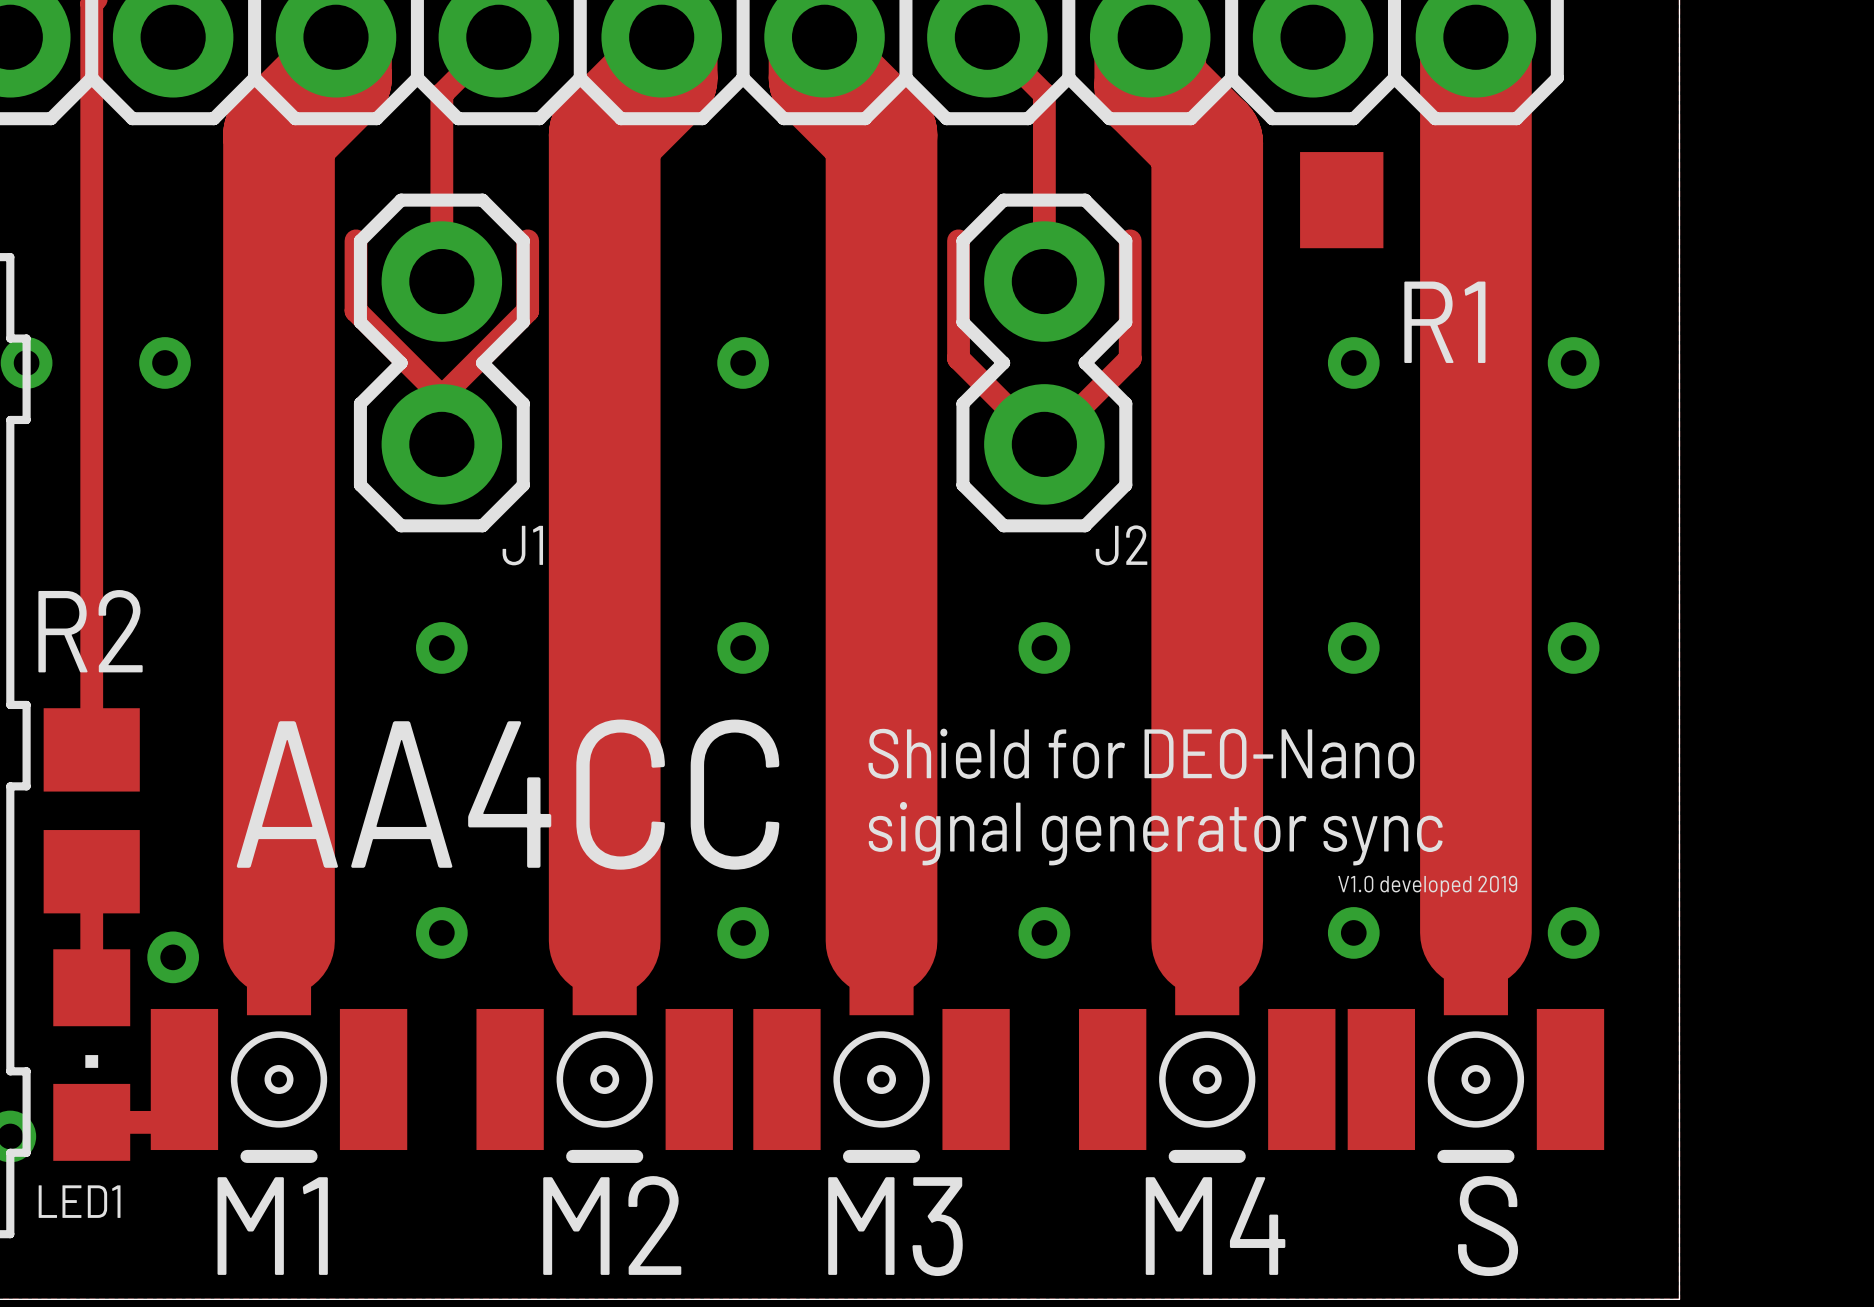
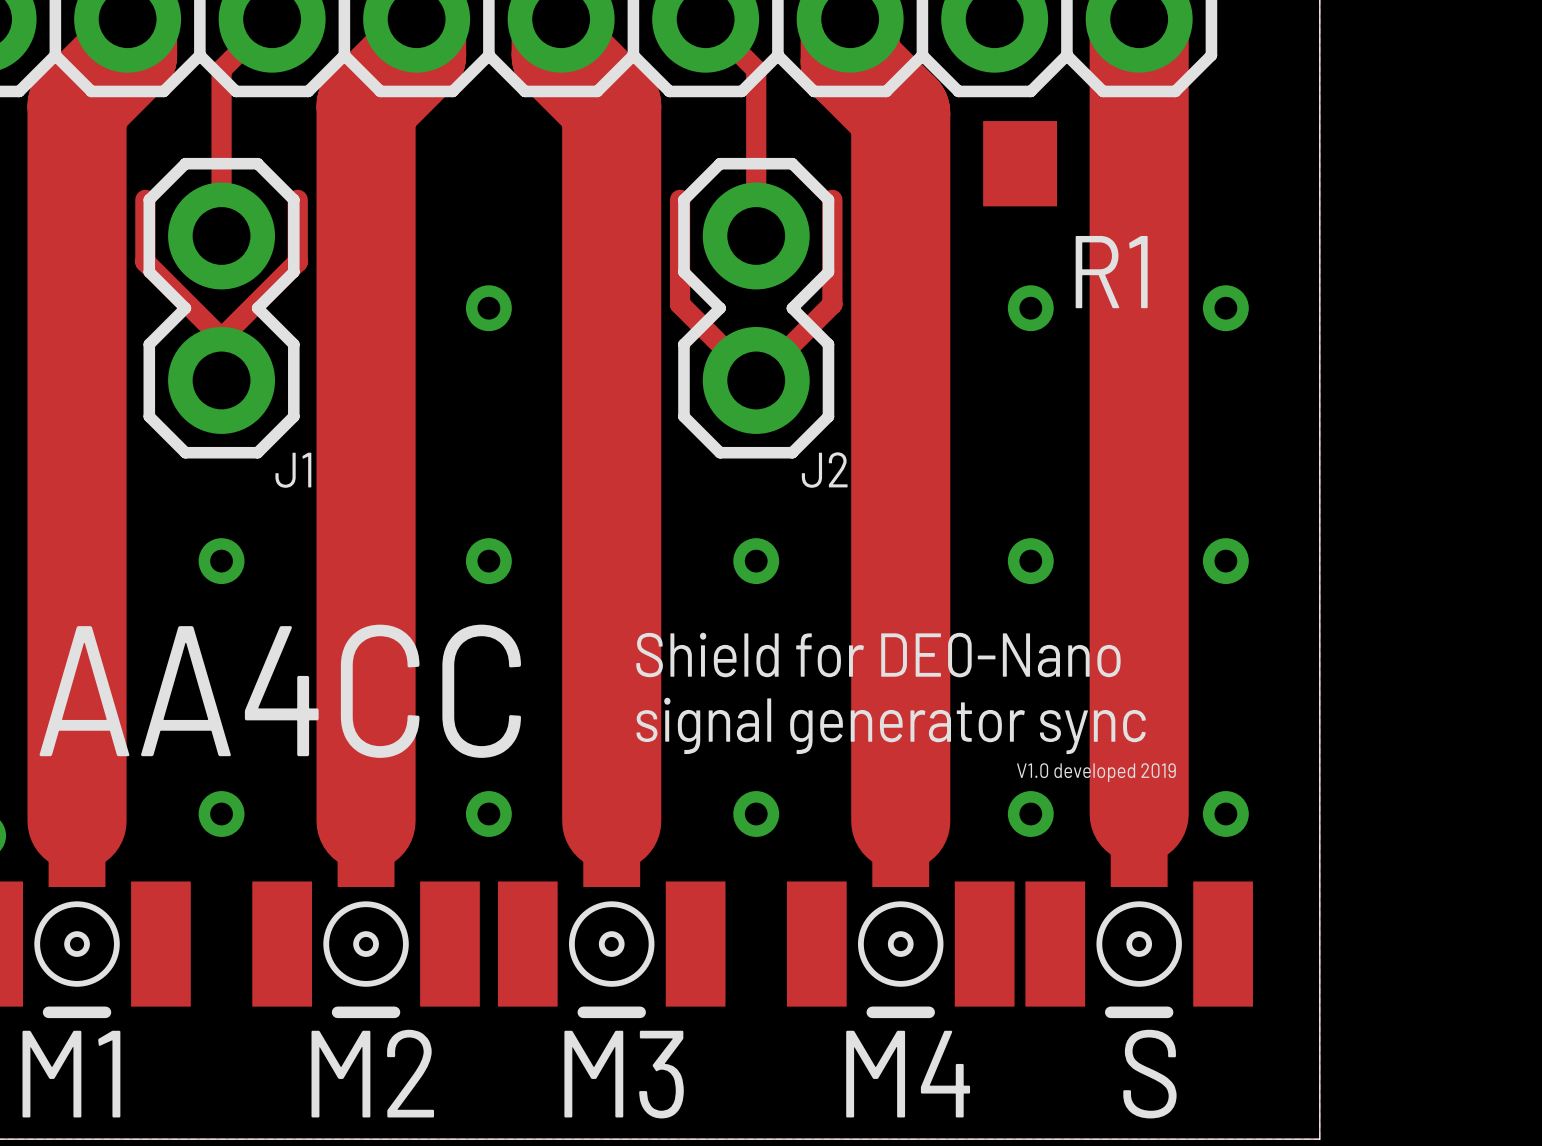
text position: Shield for DE0-Nano (1141, 753) -> Shield for DE0-Nano (878, 655)
text position: signal generator sync (1155, 833) -> signal generator sync (891, 725)

